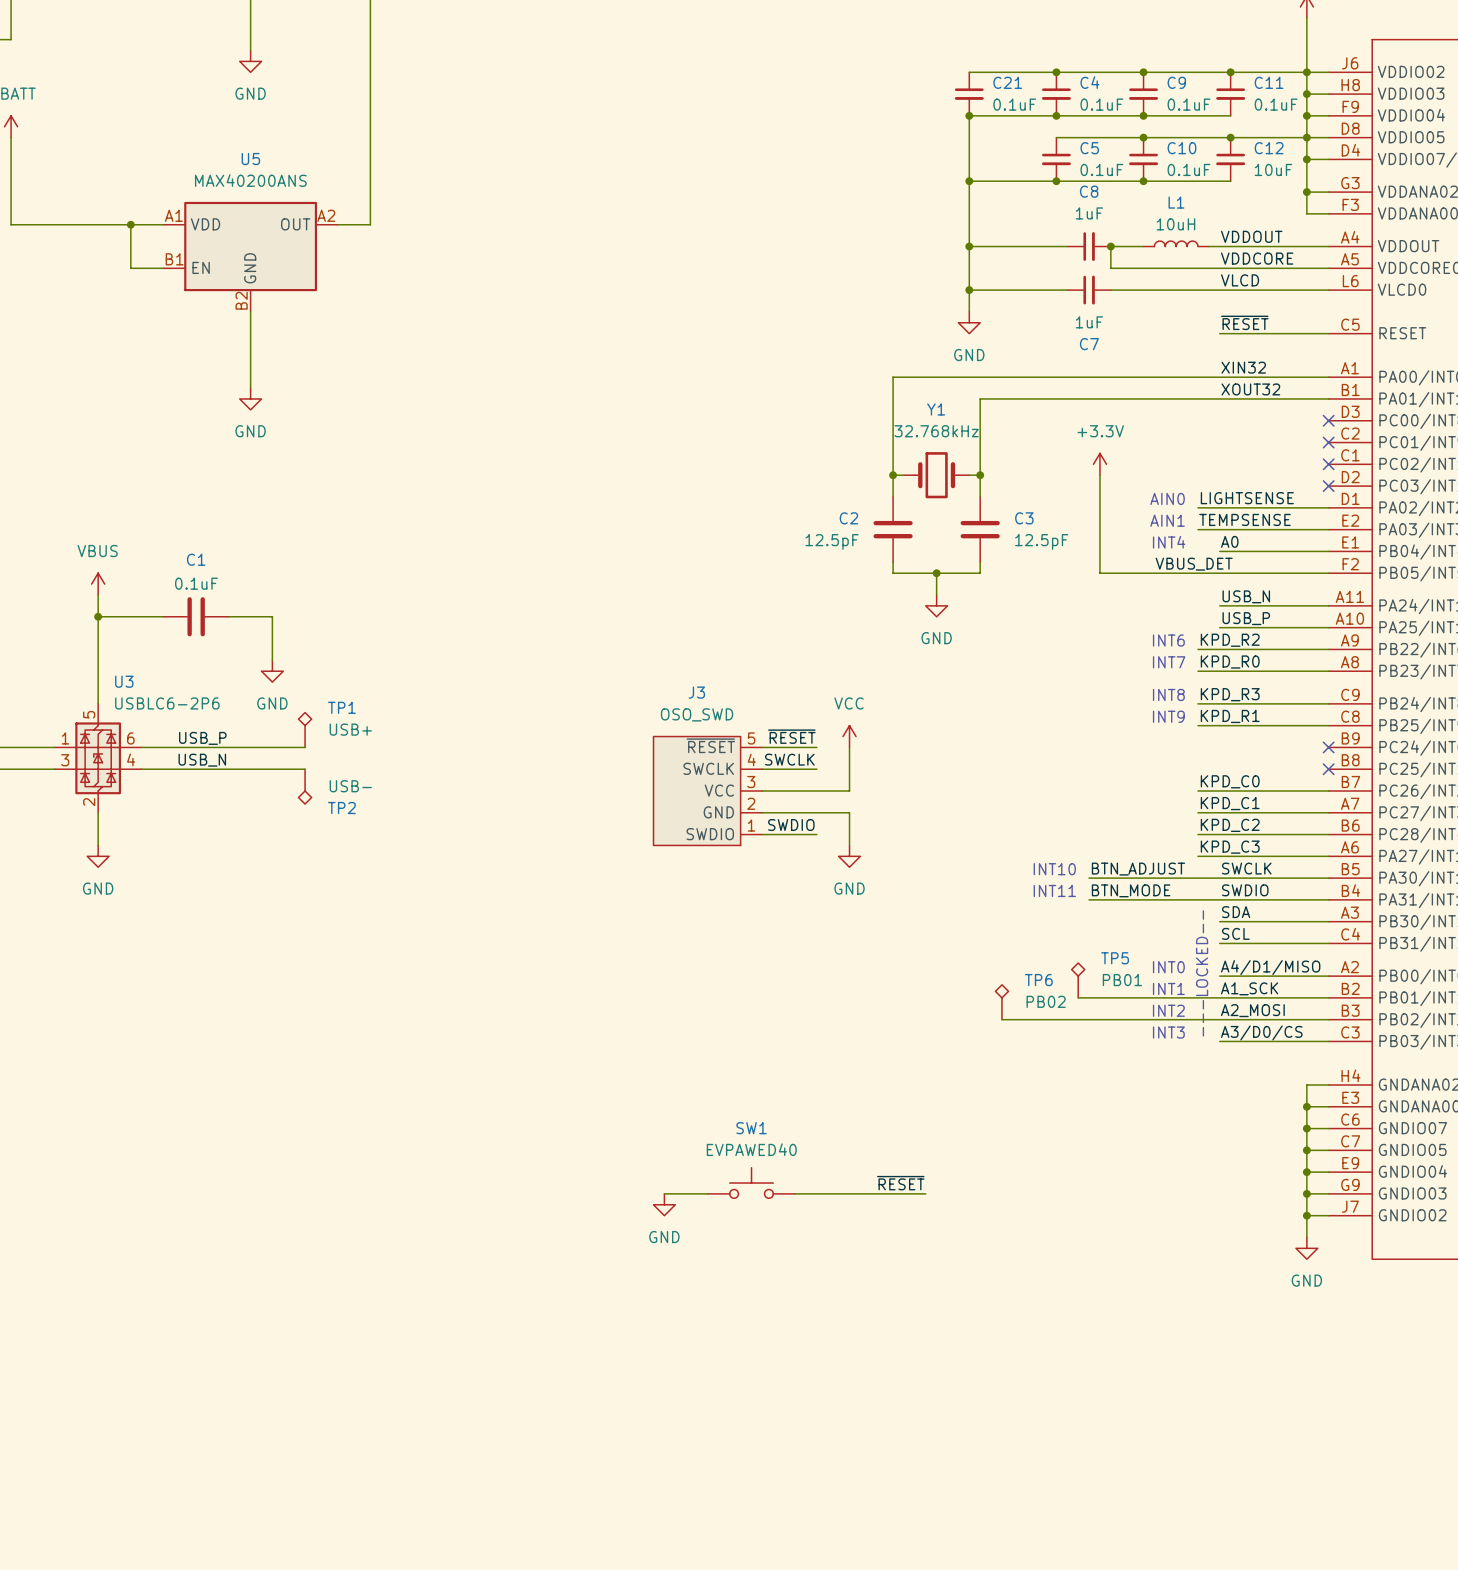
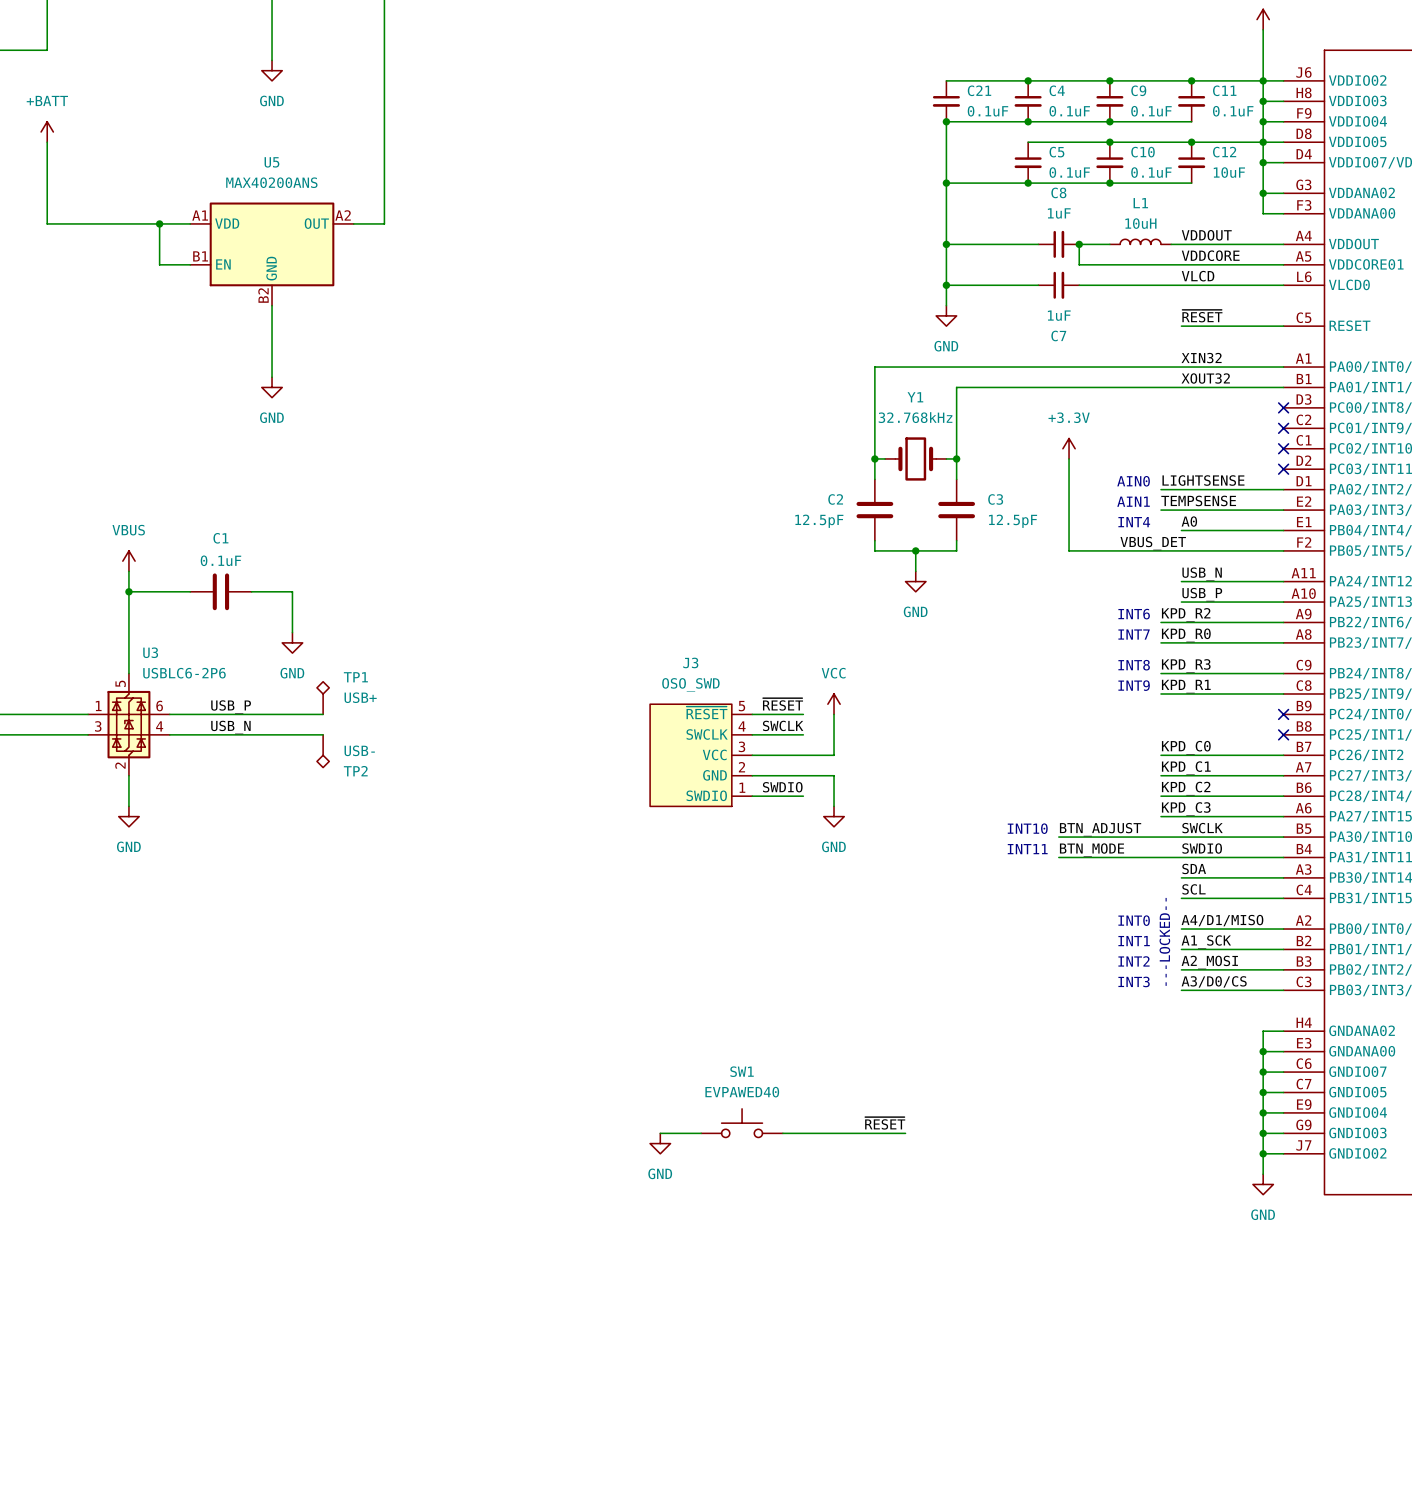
TP5: PB01 (1078, 980) -> none
wire: (1078, 997) (1219, 997) -> none
TP6: PB02 (1001, 1002) -> none
wire: (1001, 1019) (1219, 1019) -> none

